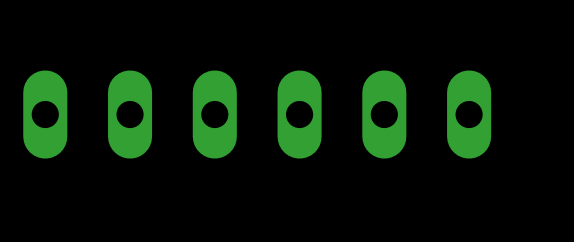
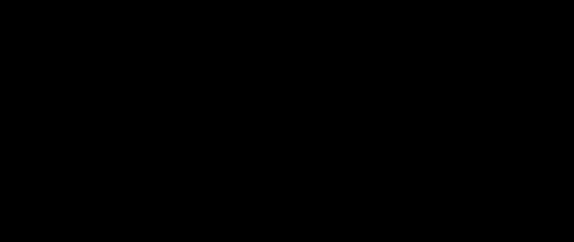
part: (257, 114) -> none

